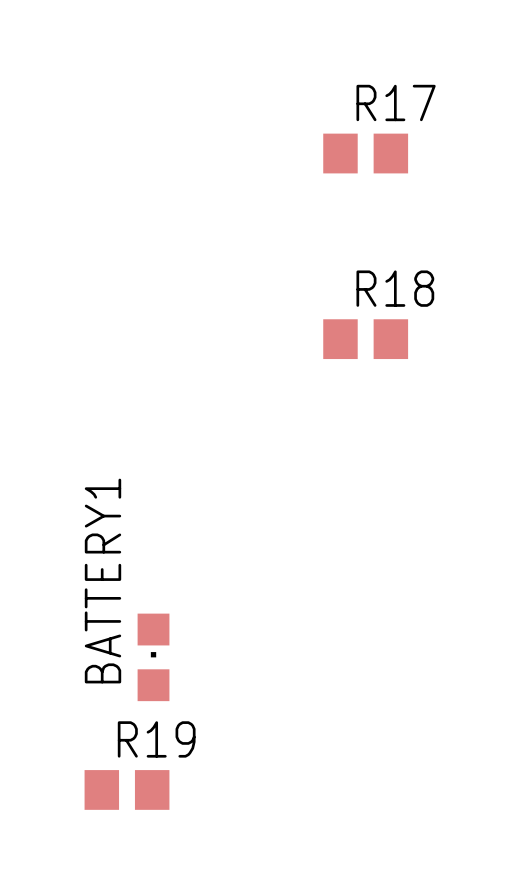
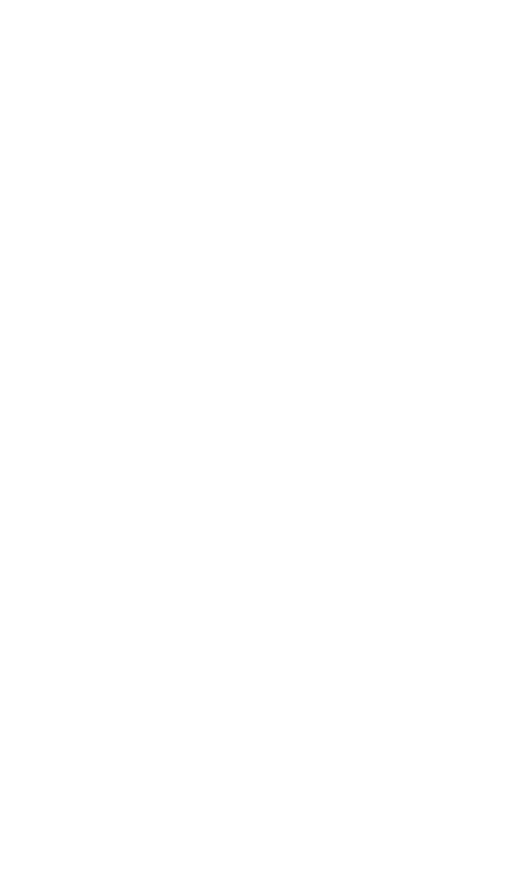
R17: (365, 153) -> none
R18: (365, 339) -> none
BATTERY1: (153, 657) -> none
R19: (126, 789) -> none

